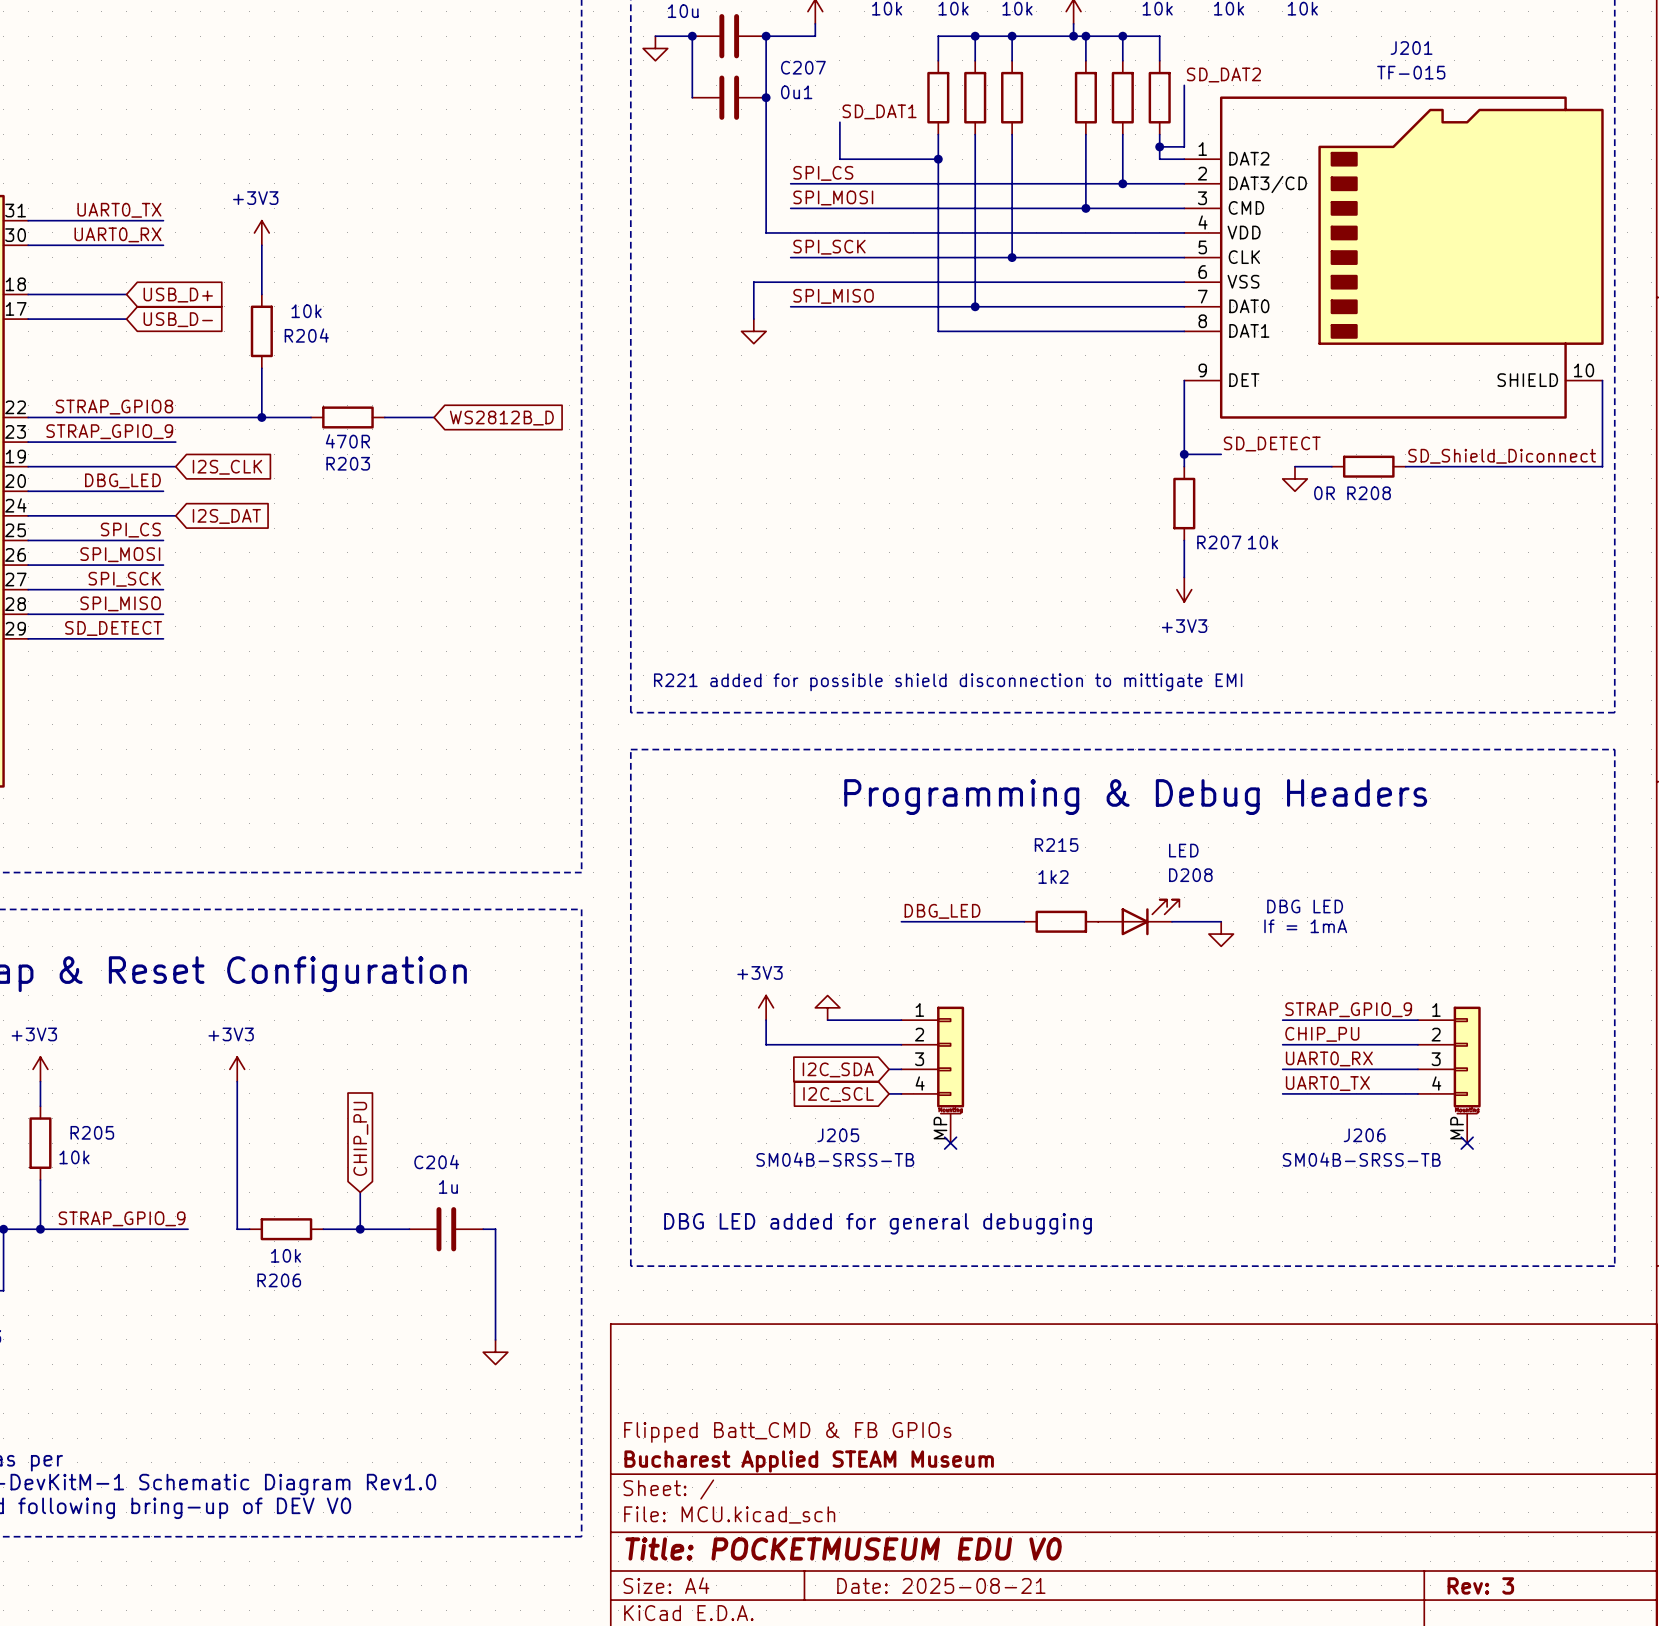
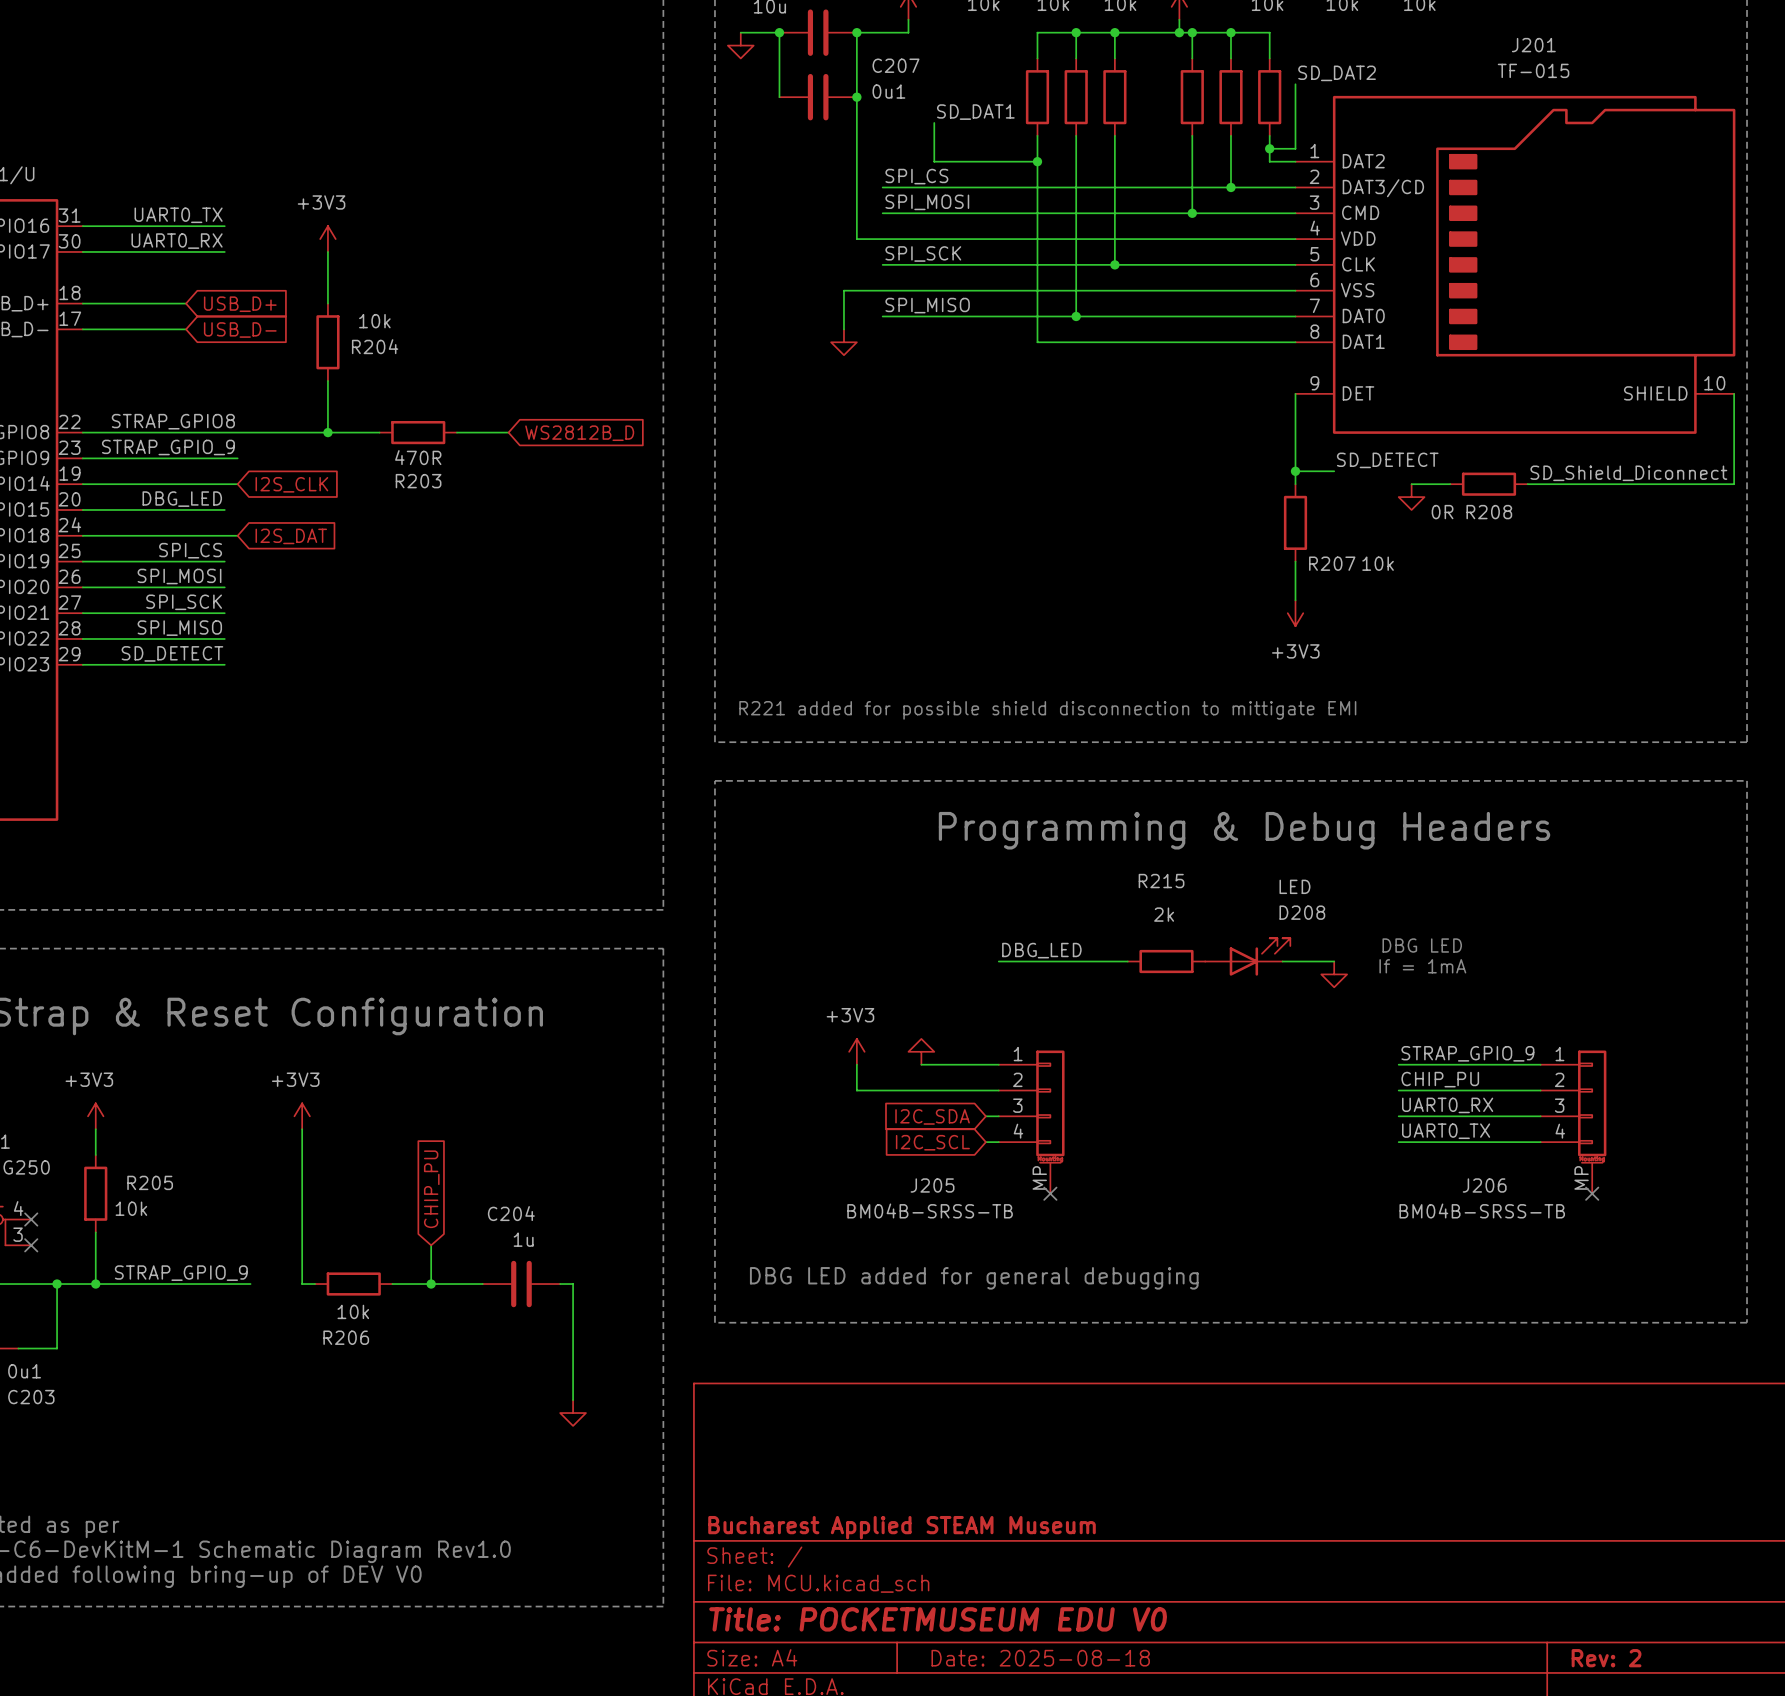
R215 value: 1k2 (1053, 877) -> 2k (1164, 914)
J205 value: SM04B-SRSS-TB (835, 1159) -> BM04B-SRSS-TB (930, 1210)
J206 value: SM04B-SRSS-TB (1361, 1159) -> BM04B-SRSS-TB (1482, 1210)
title block: Flipped Batt_CMD & FB GPIOs (787, 1432) -> none
title block: Date: 2025-08-21 (941, 1585) -> Date: 2025-08-18 (1040, 1658)
title block: Rev: 3 (1480, 1585) -> Rev: 2 (1606, 1658)

